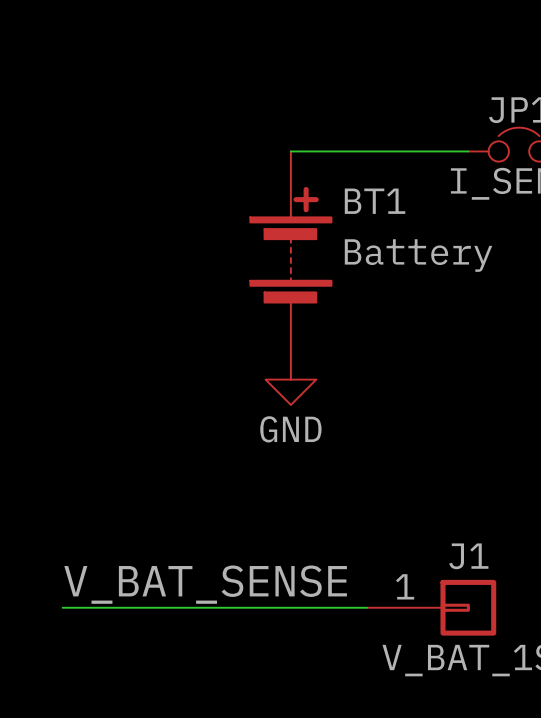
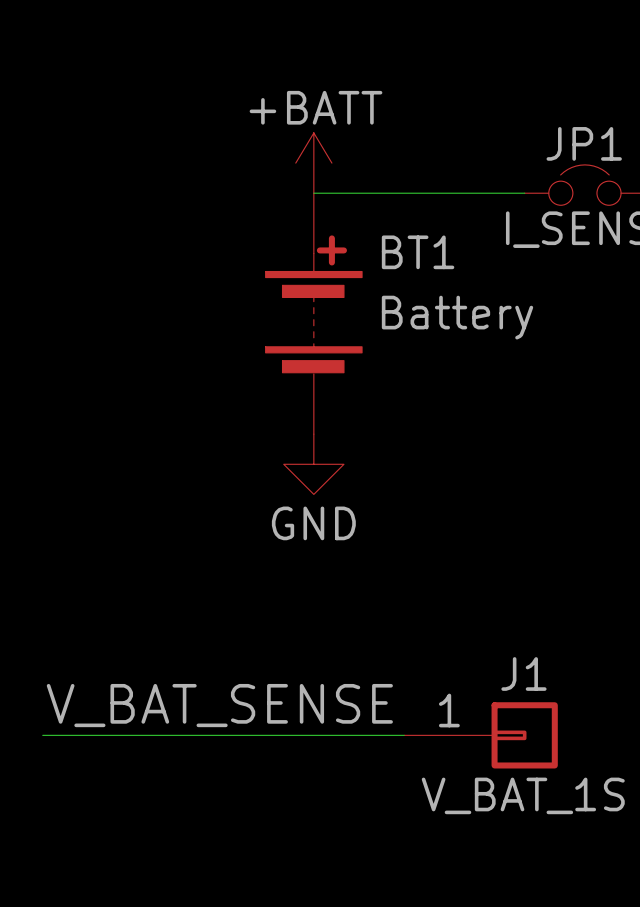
power symbol: none -> +BATT (313, 163)

